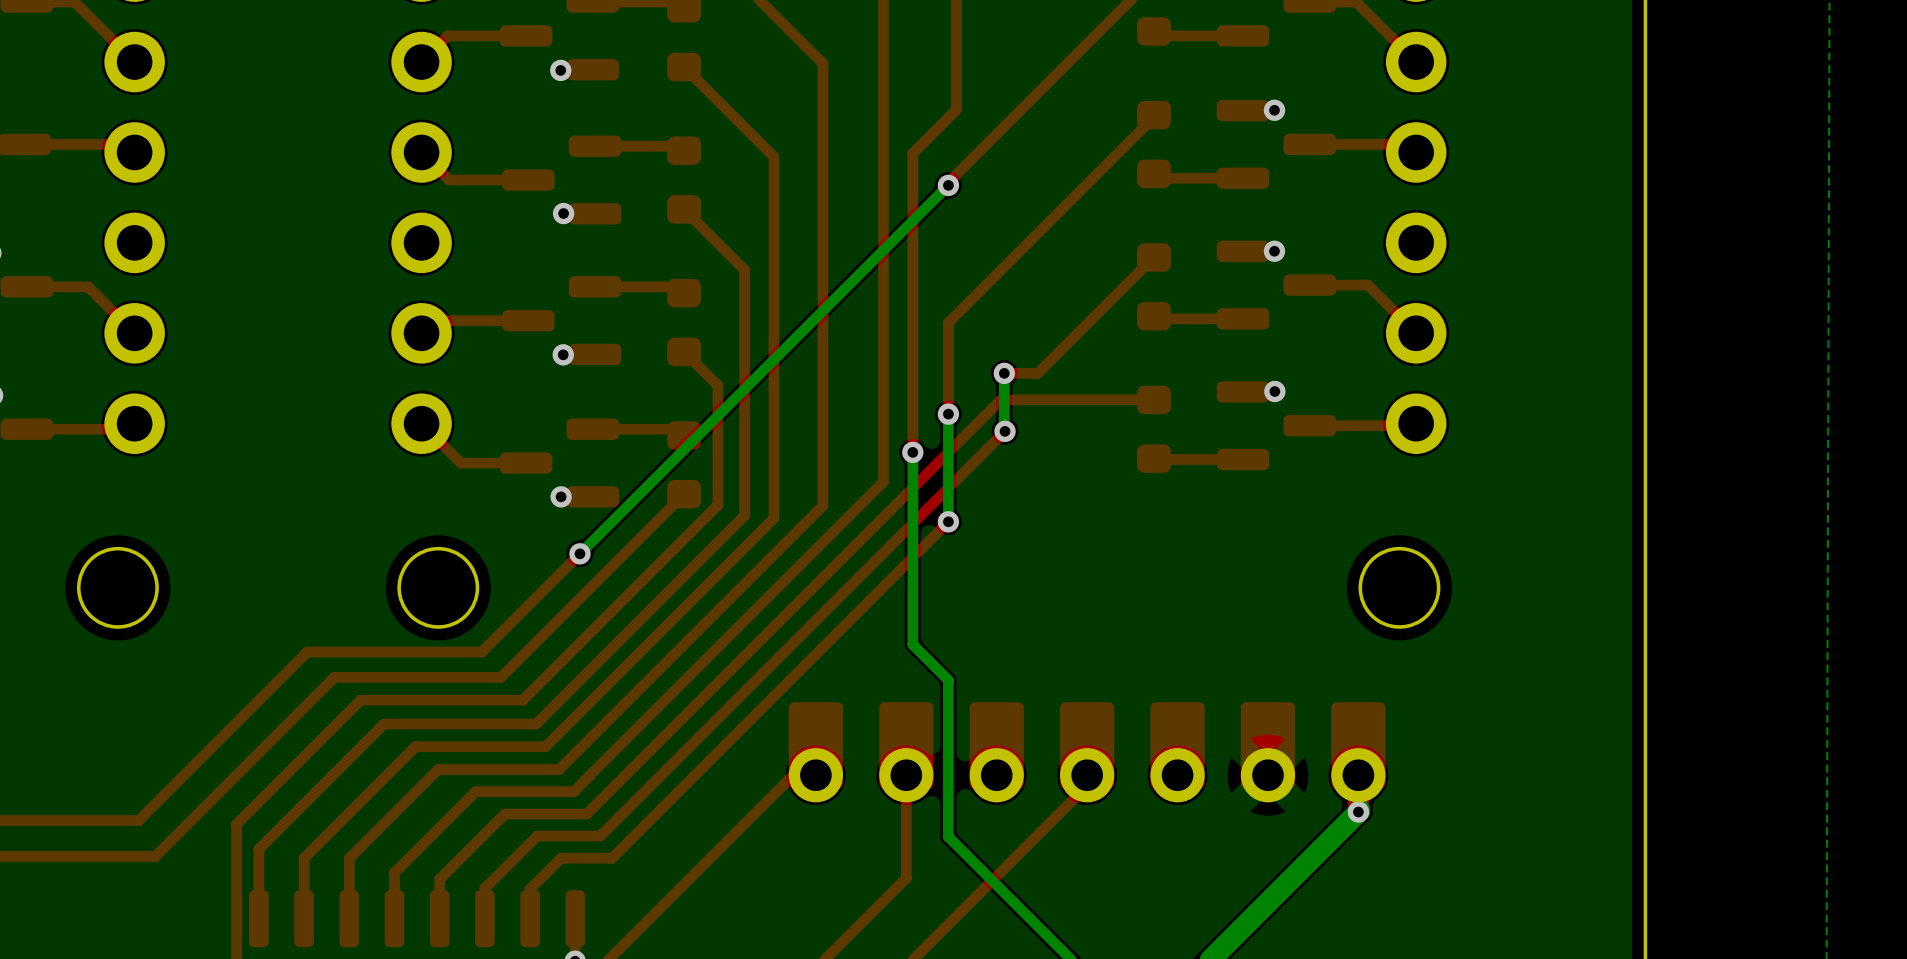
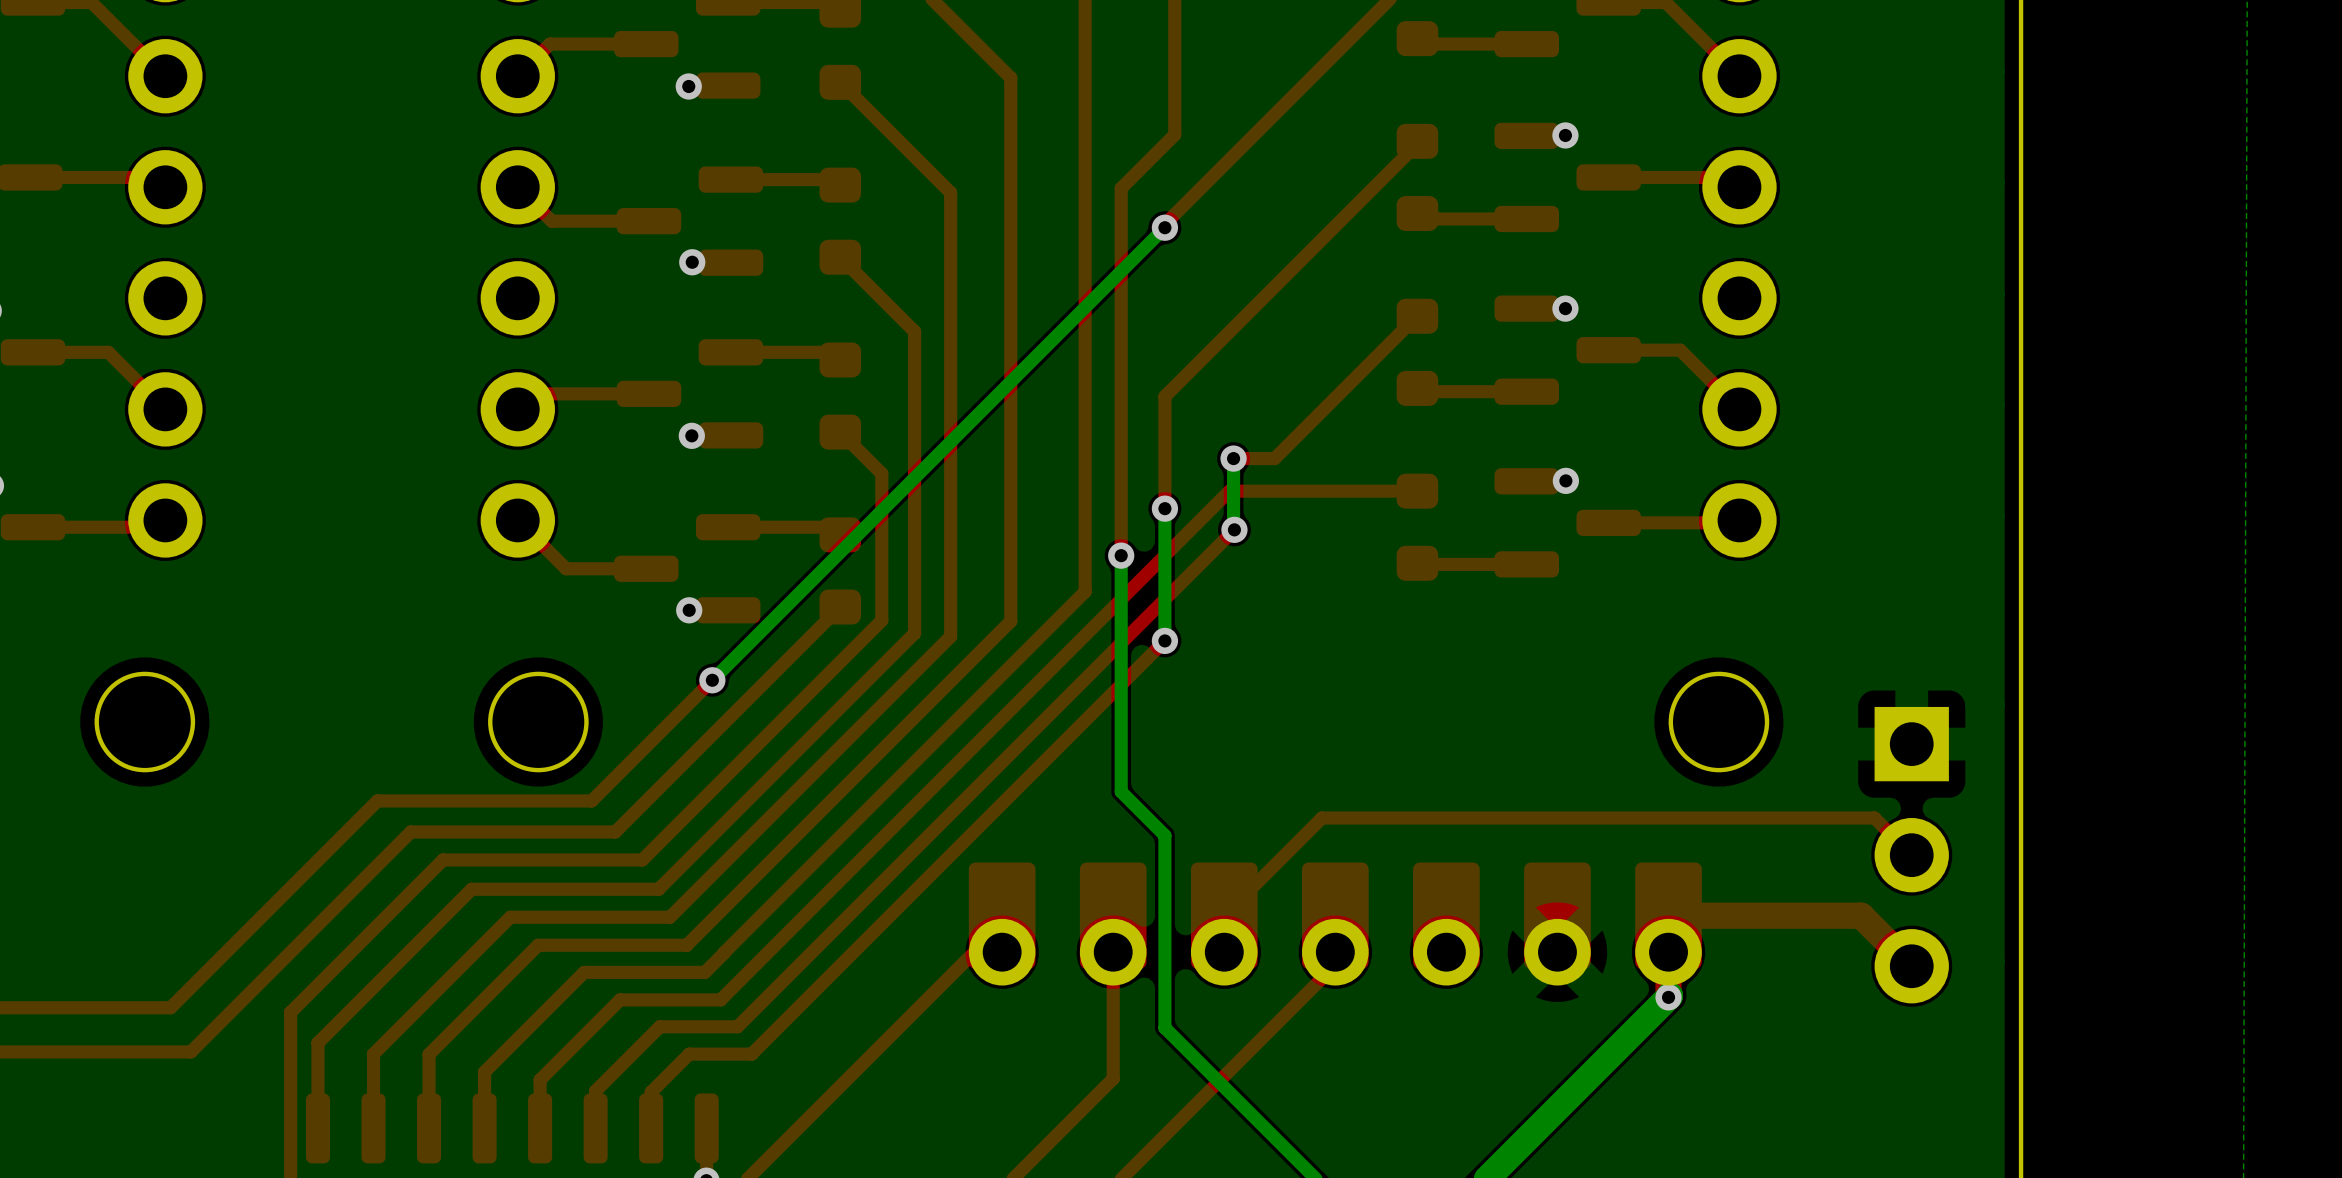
top track: none -> (1911, 855) (1874, 818) (1321, 818) (1224, 915)
part: none -> (1911, 855)
top track: none -> (1668, 915) (1861, 915) (1911, 966)

